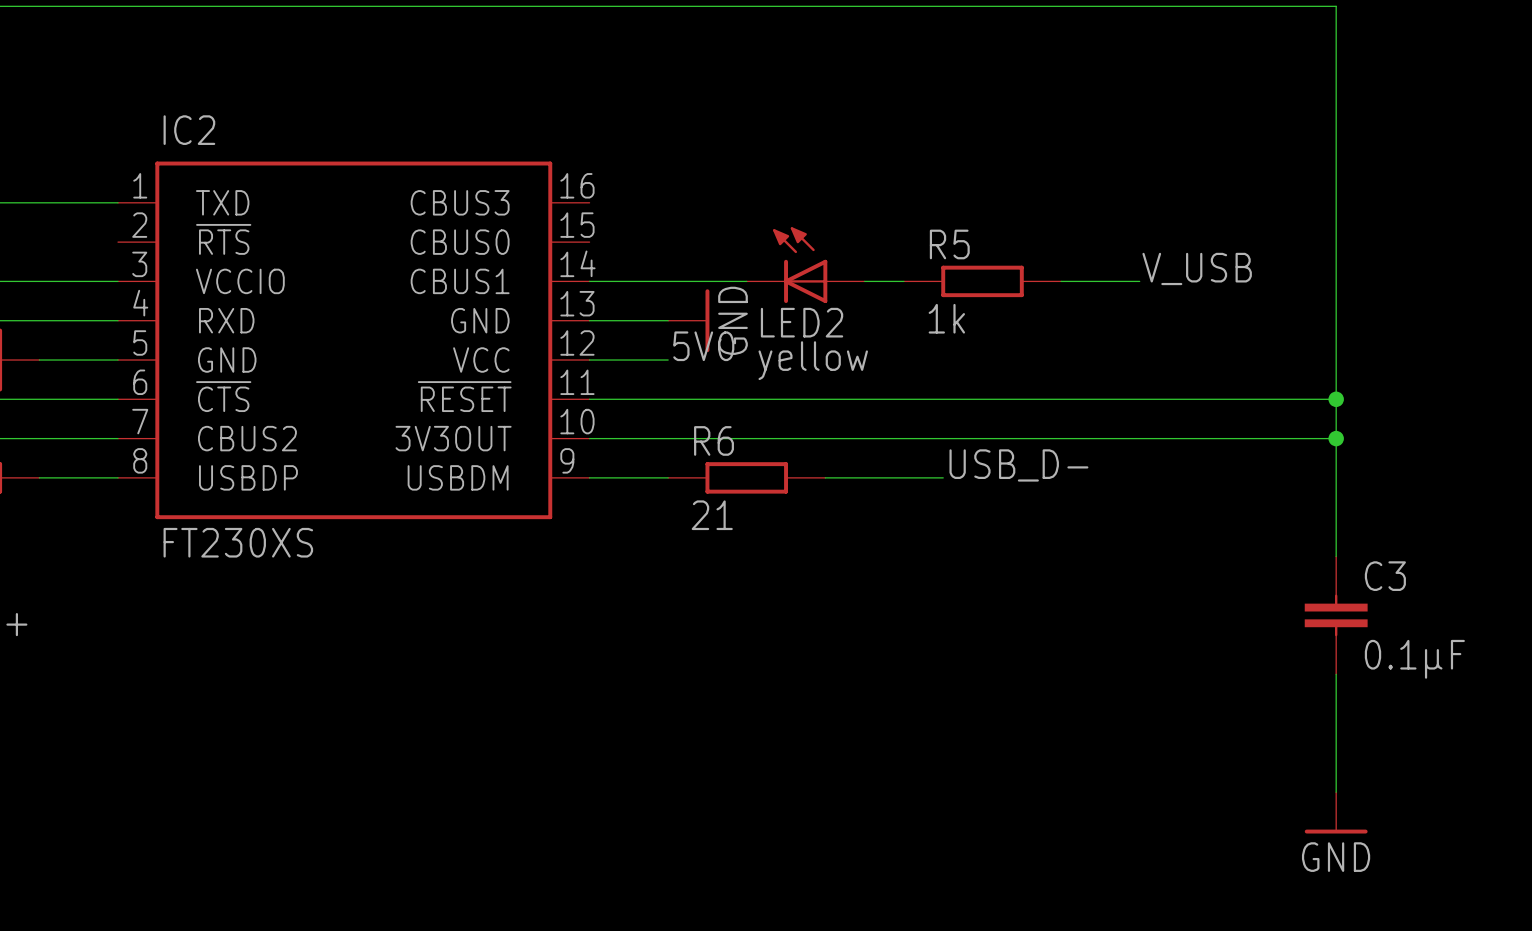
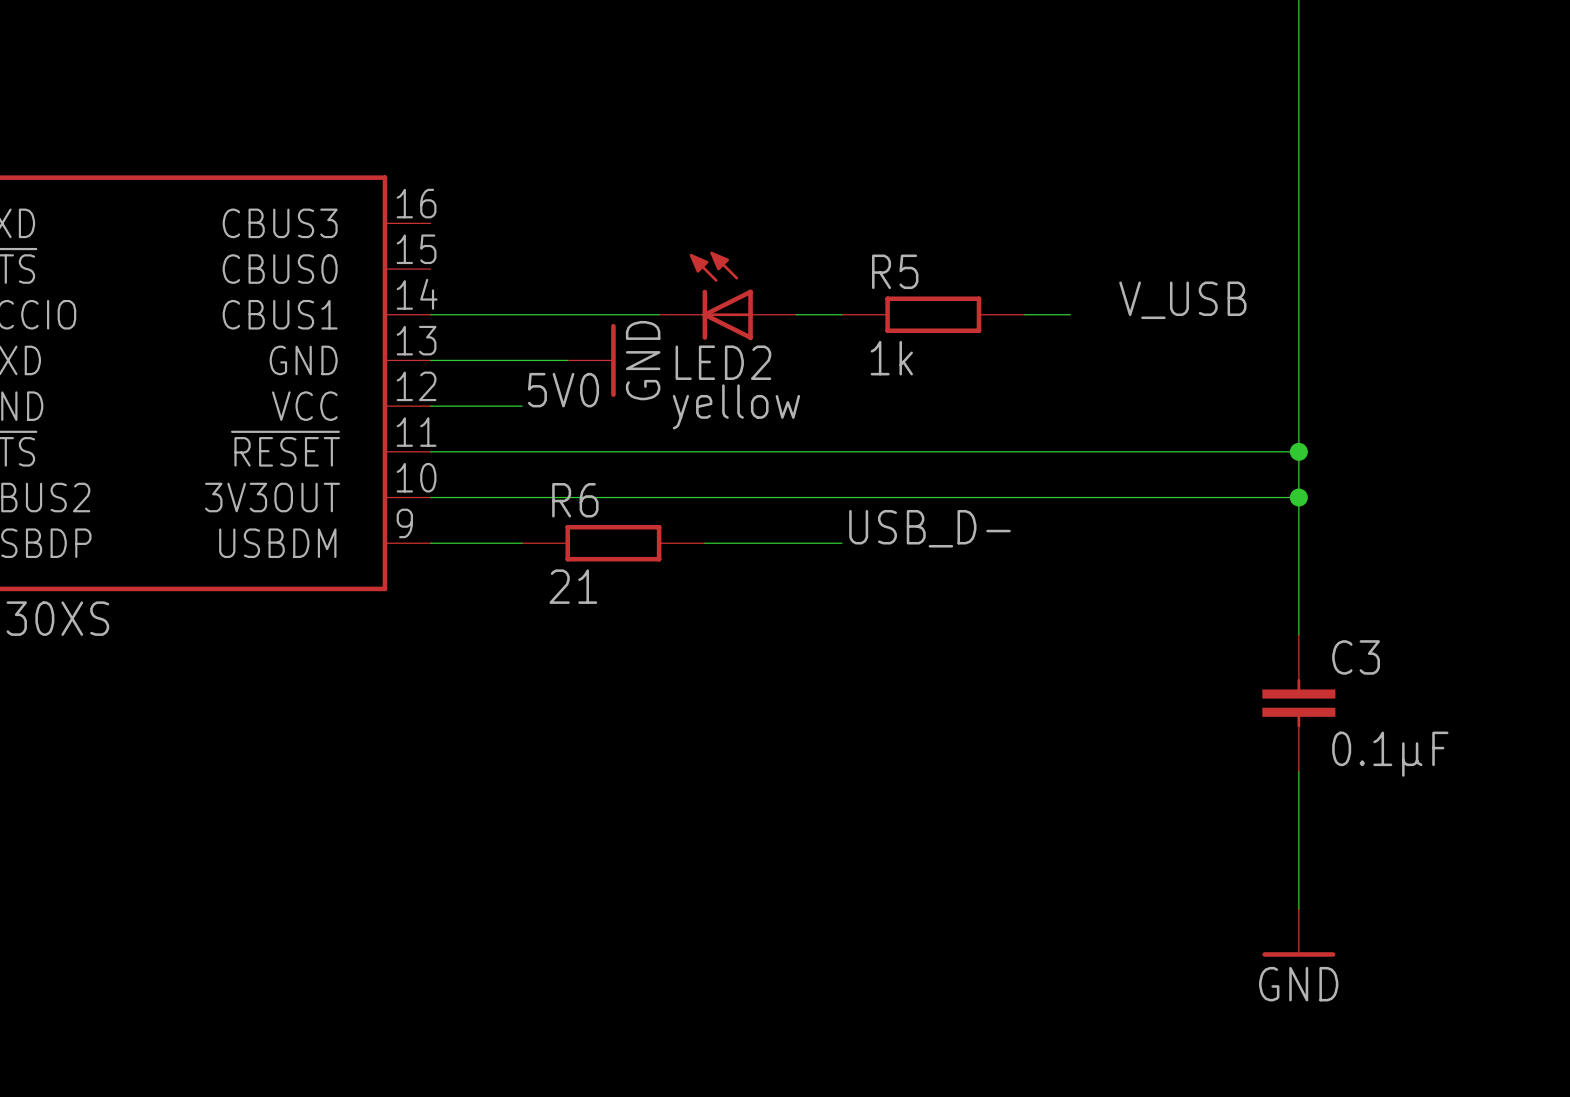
LED2 position: (805, 265) -> (727, 295)
label position: V_USB (1197, 268) -> V_USB (1182, 300)
R5 position: (982, 281) -> (933, 314)
power symbol position: GND (688, 320) -> GND (591, 360)

